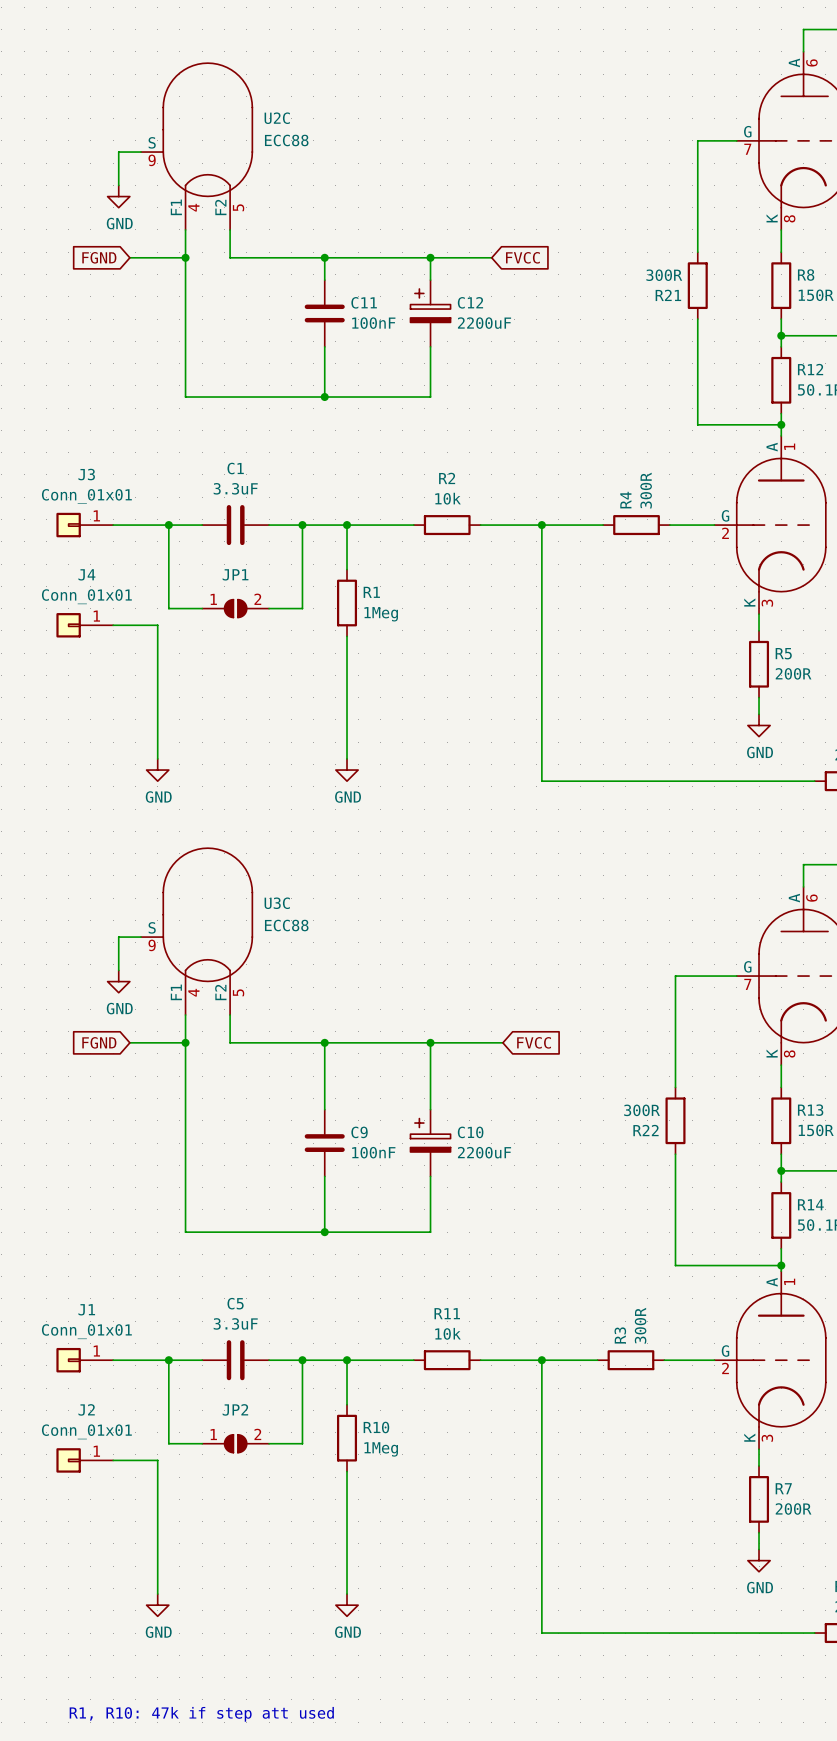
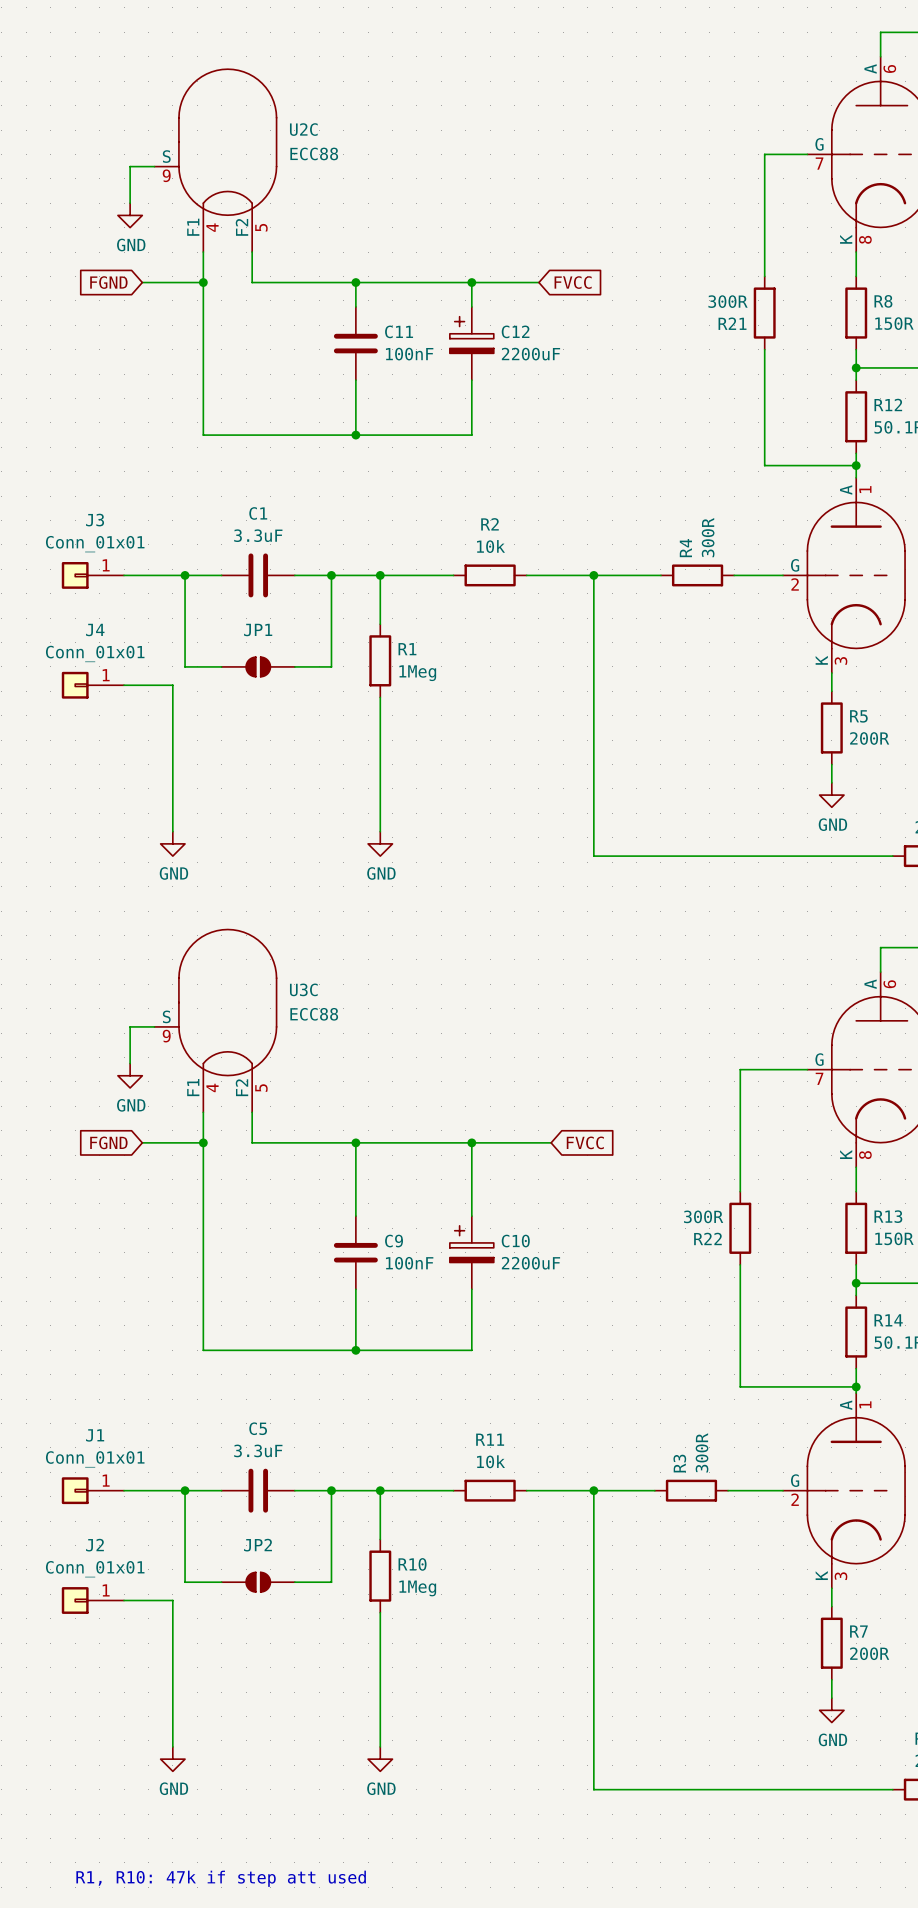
JP1 pin number: 1 (213, 599) -> none
JP1 pin number: 2 (257, 599) -> none
JP2 pin number: 1 (213, 1434) -> none
JP2 pin number: 2 (257, 1434) -> none

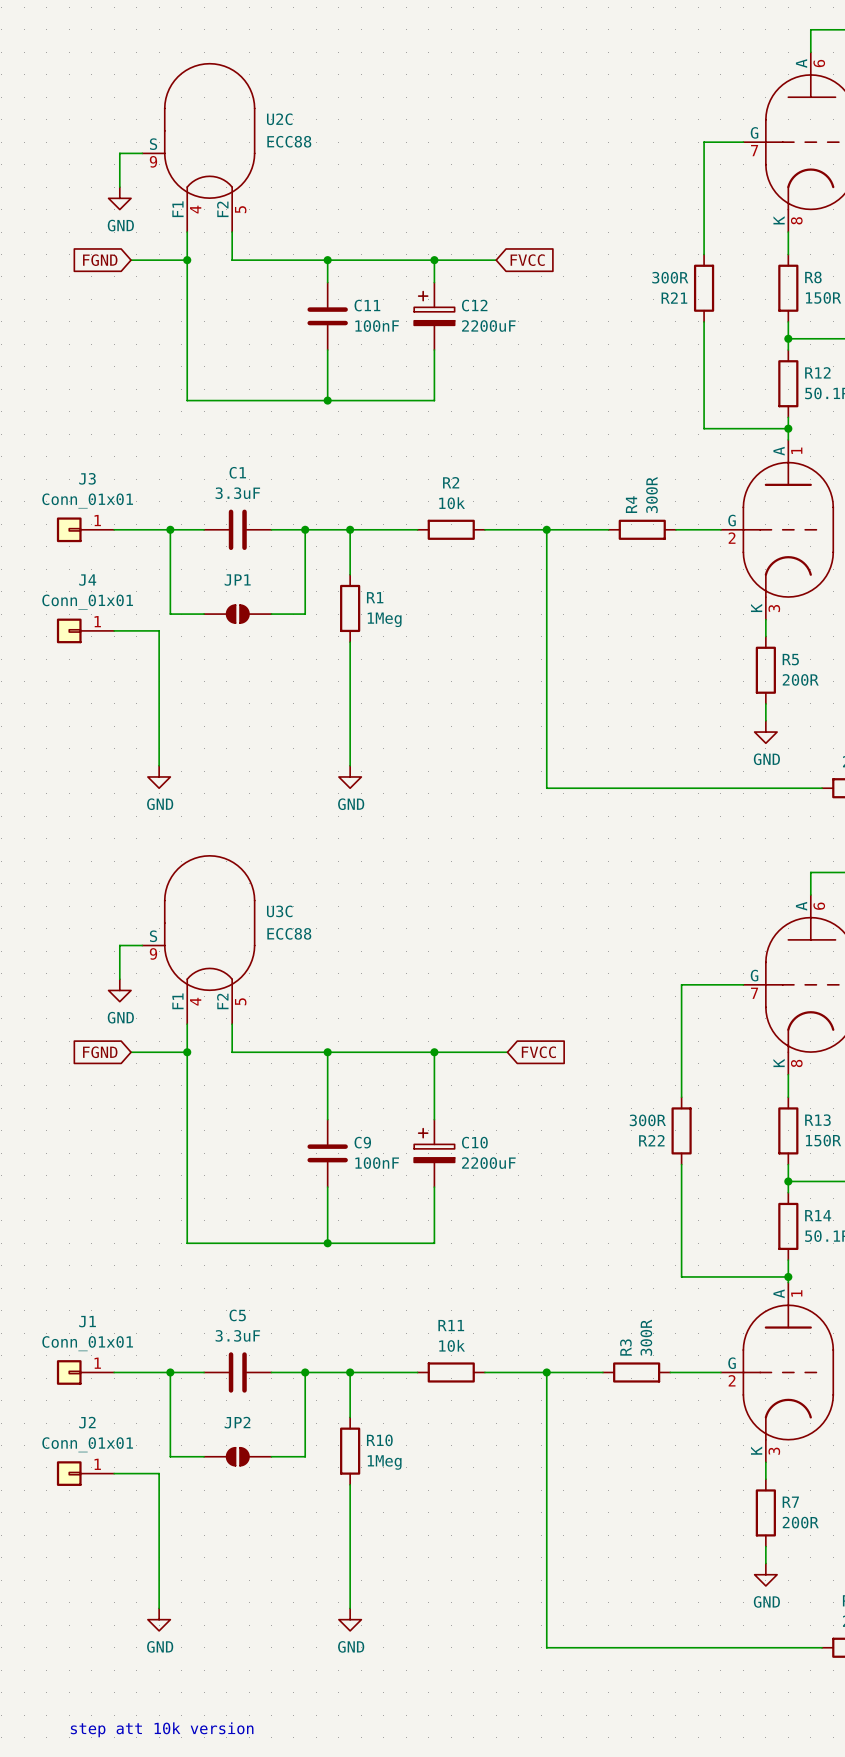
text: R1, R10: 47k if step att used (221, 1878) -> step att 10k version (162, 1729)

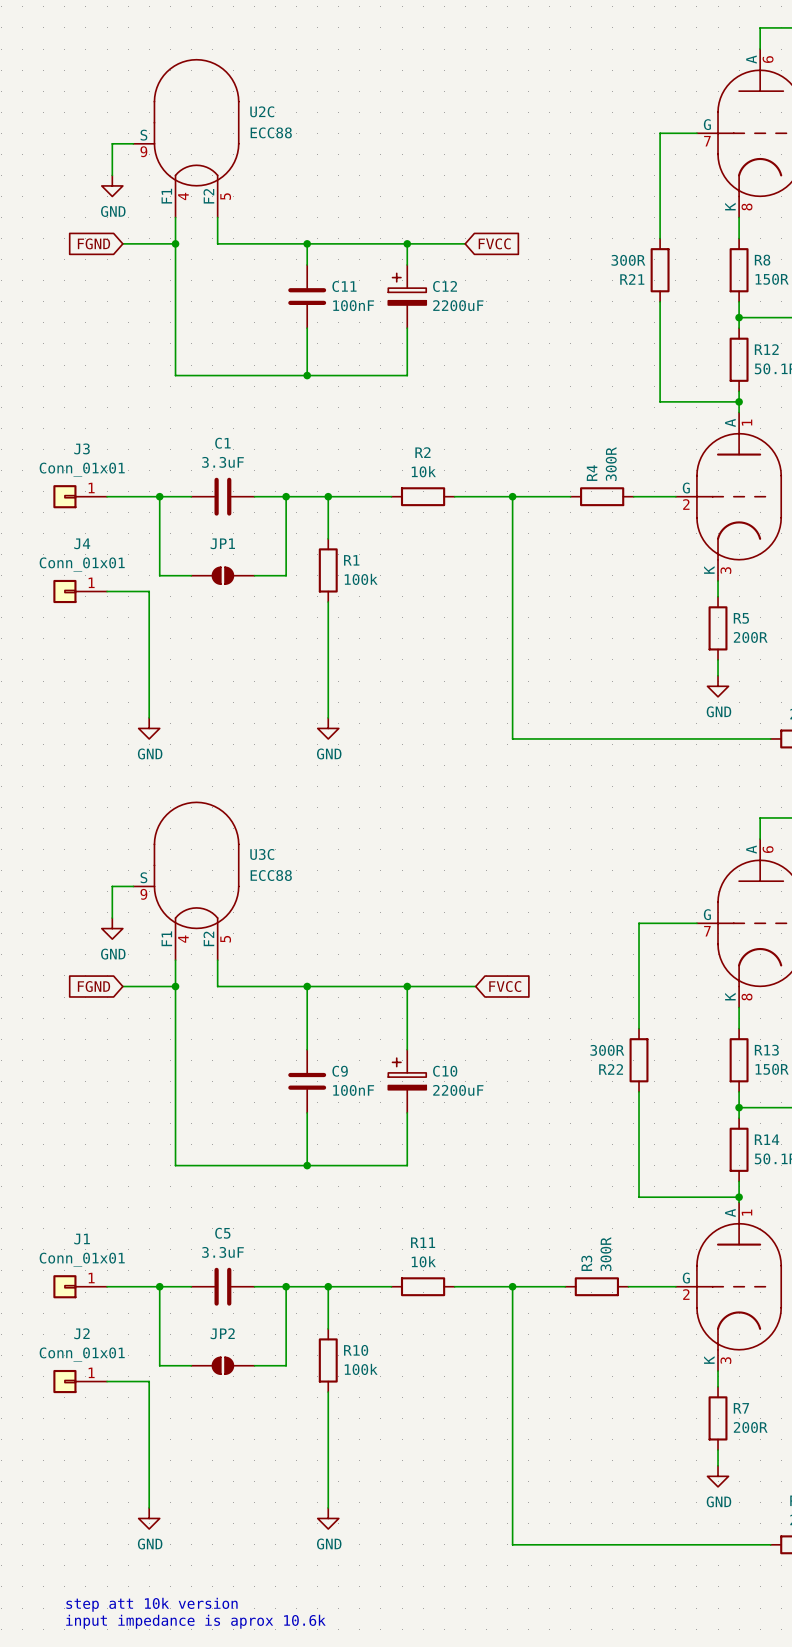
R1 value: 1Meg (384, 619) -> 100k (361, 579)
R10 value: 1Meg (384, 1462) -> 100k (361, 1369)
text: none -> step att 10k version (152, 1604)
text: step att 10k version (162, 1729) -> input impedance is aprox 10.6k (195, 1621)

